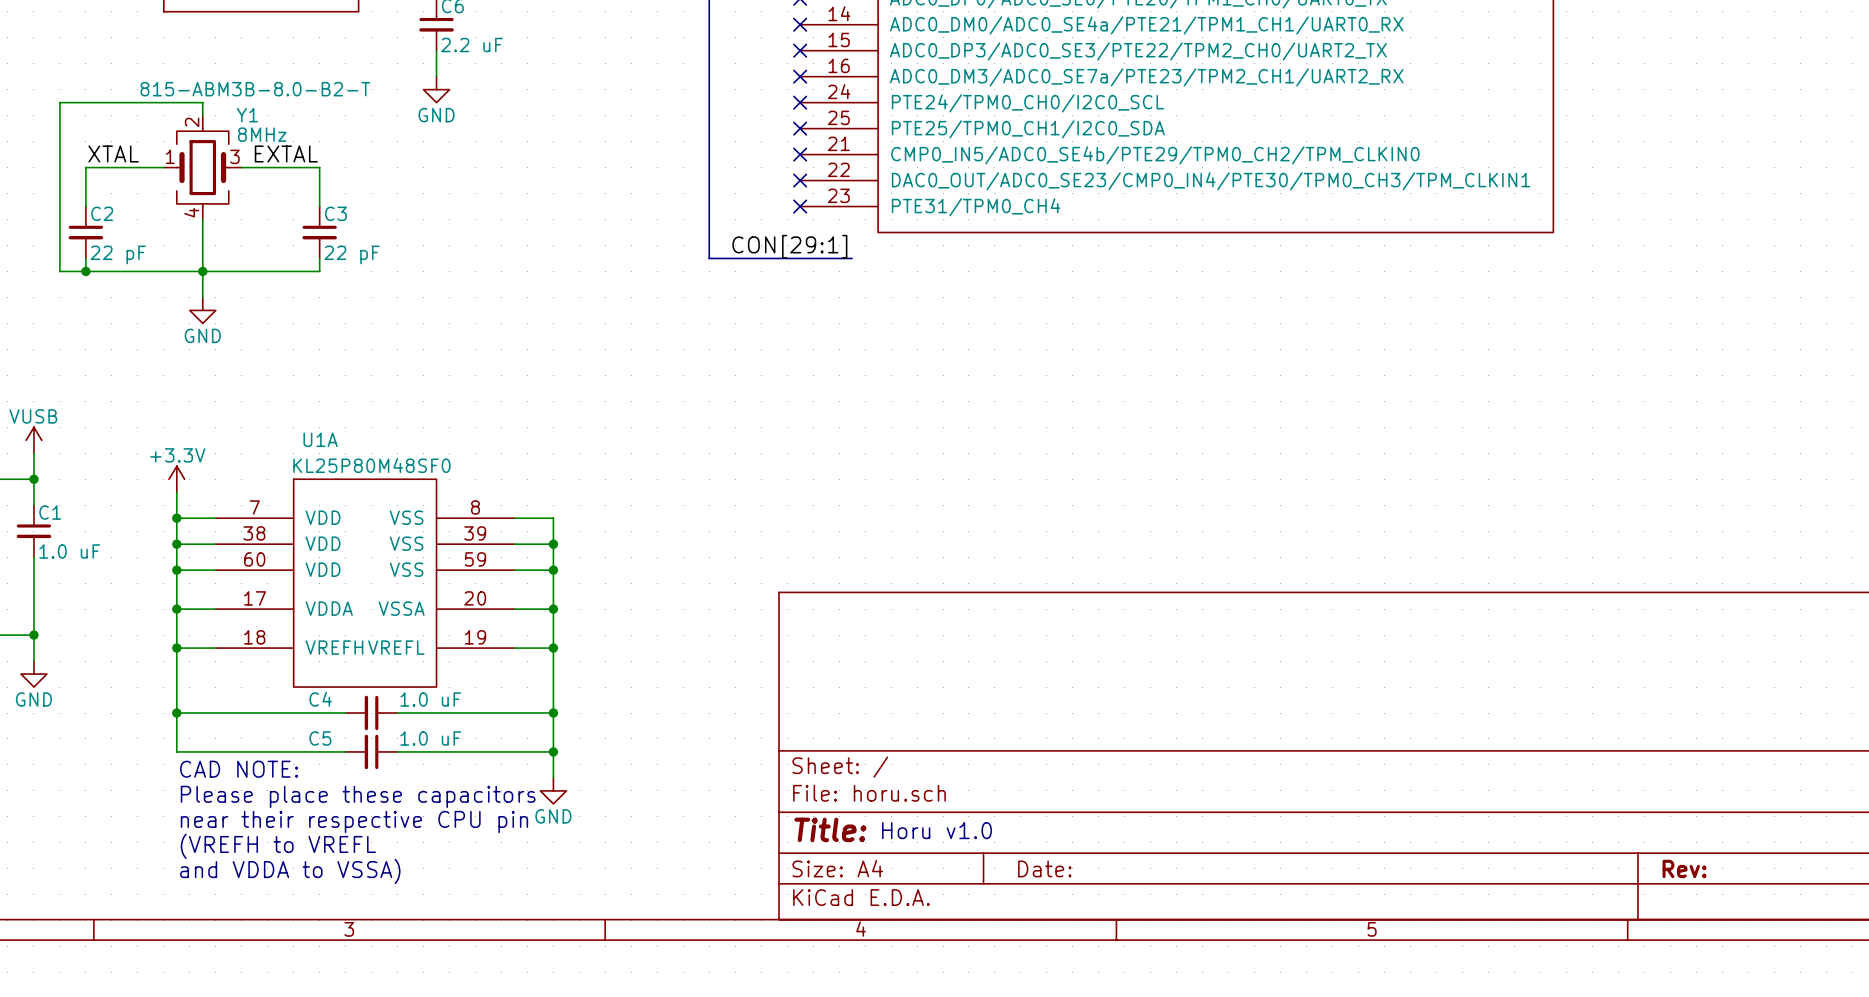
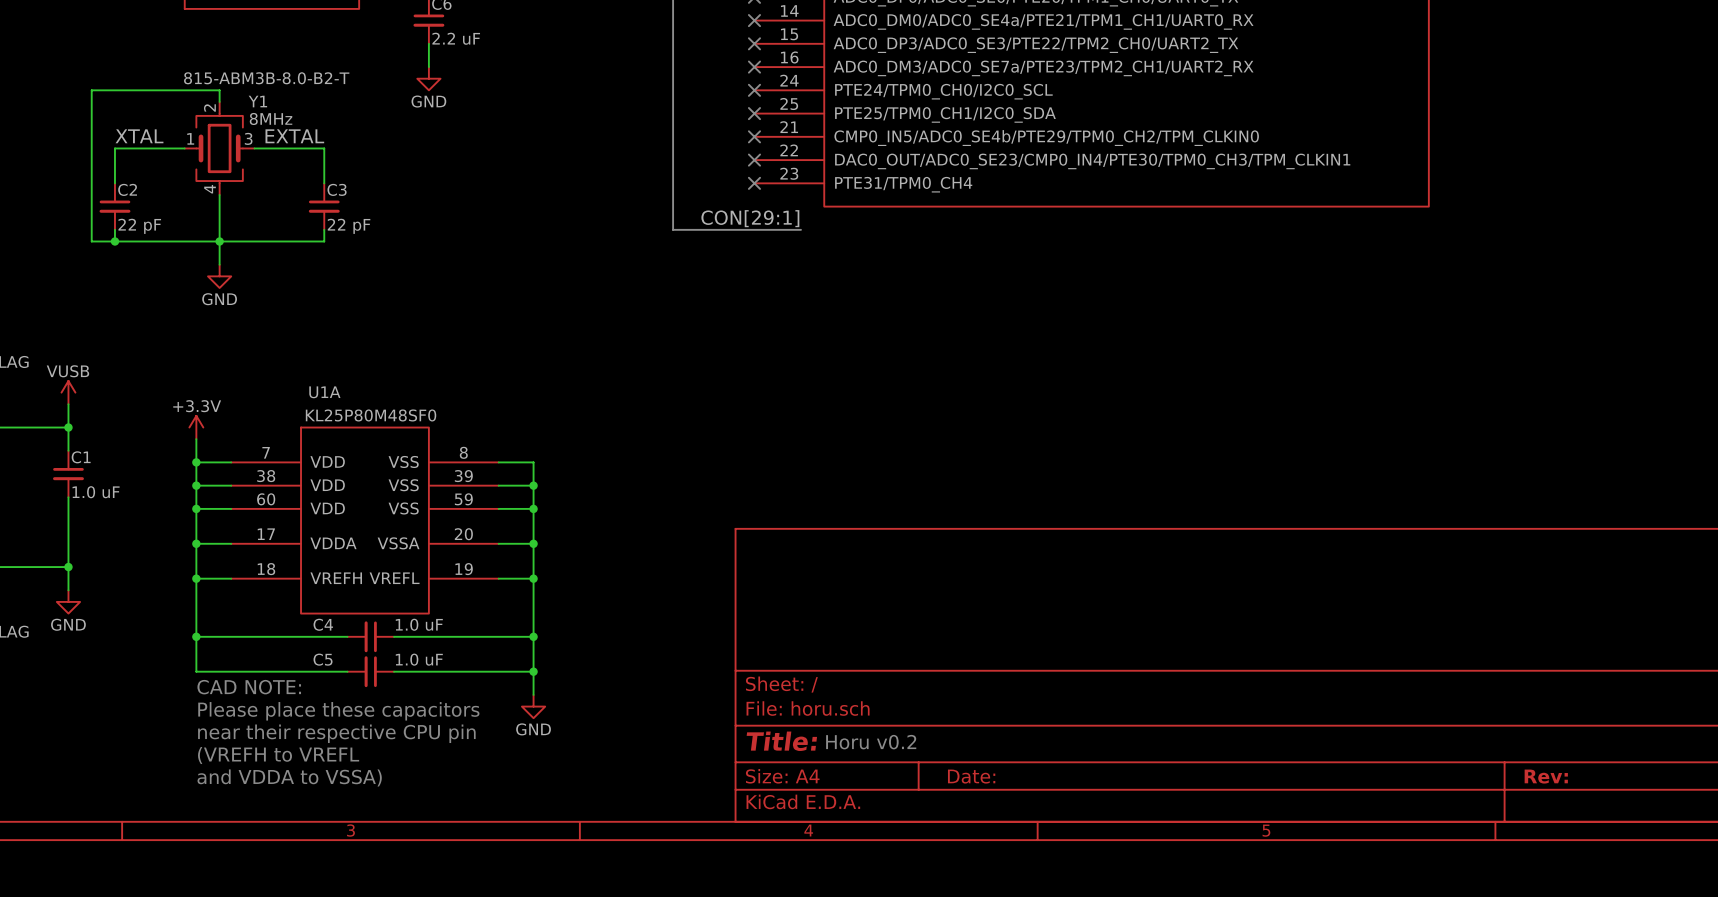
text: Horu v1.0 (936, 830) -> Horu v0.2 (871, 742)

